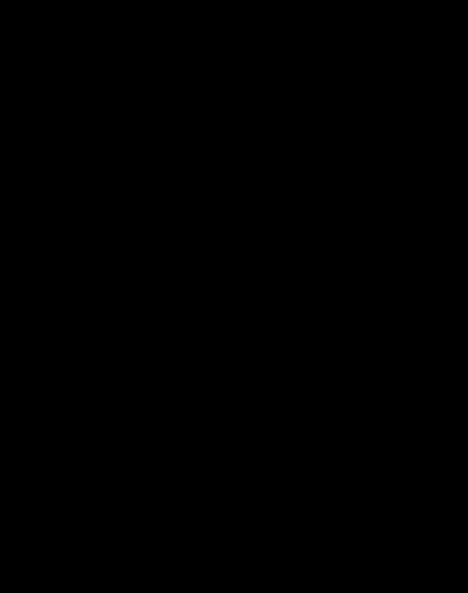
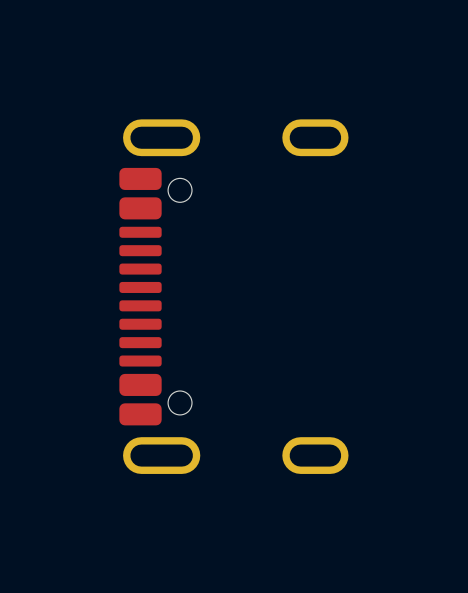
part: none -> (233, 296)

